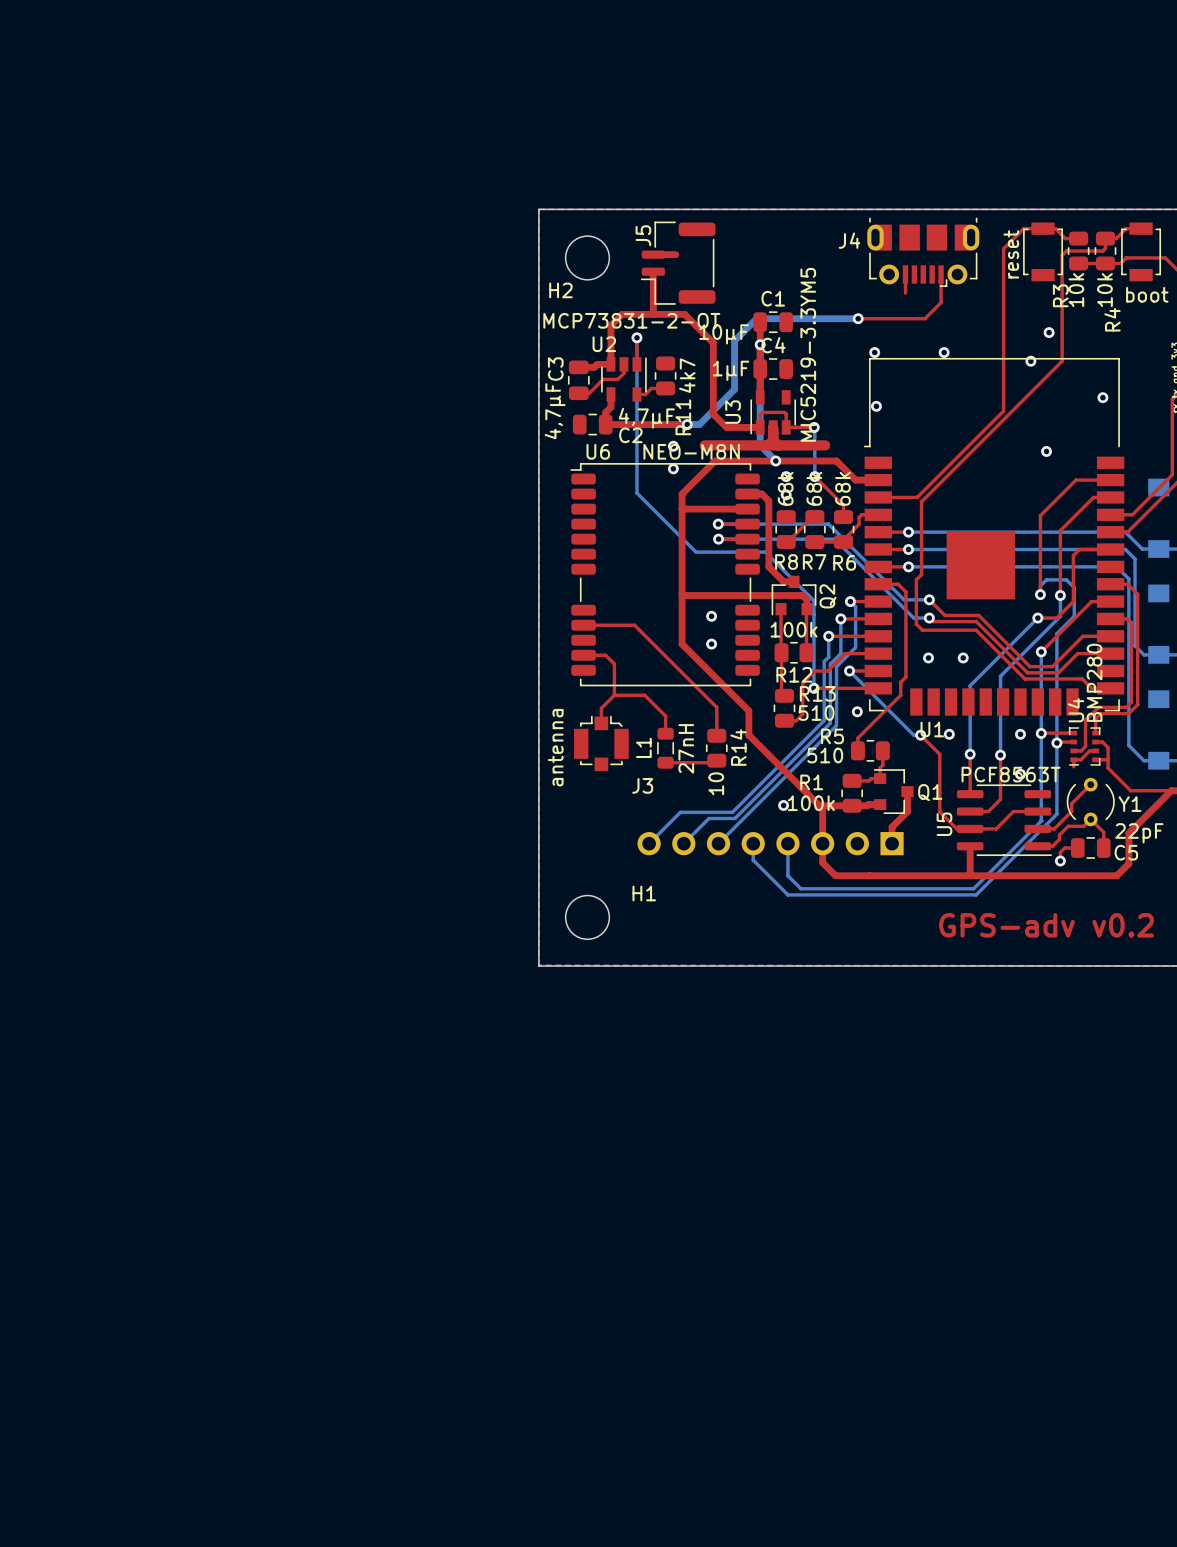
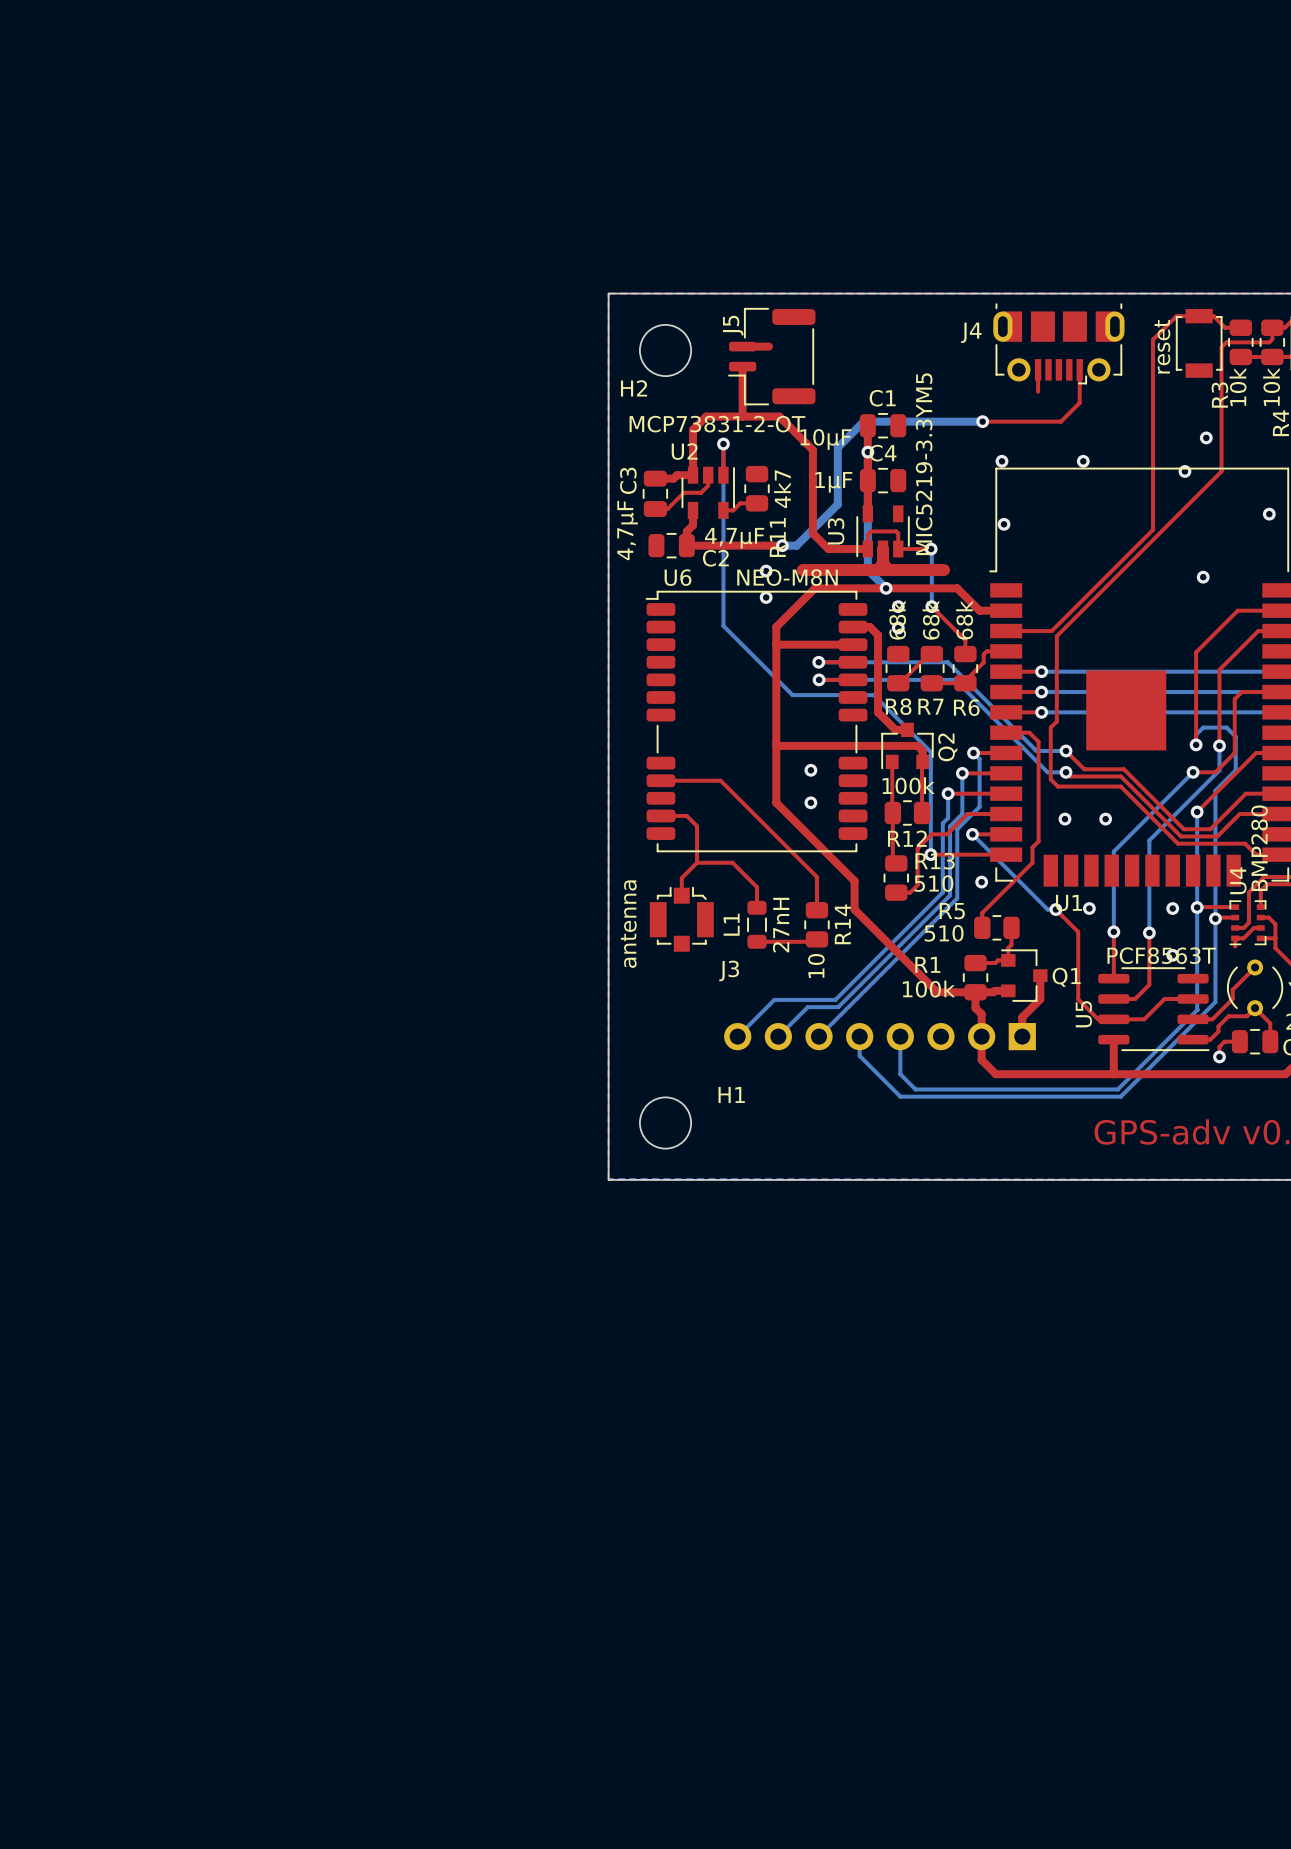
via: (783, 805) -> none
top track: (822, 805) (822, 862) (835, 875) (869, 875) -> (975, 992) (975, 1008) (981, 1014) (981, 1059) (995, 1074)

